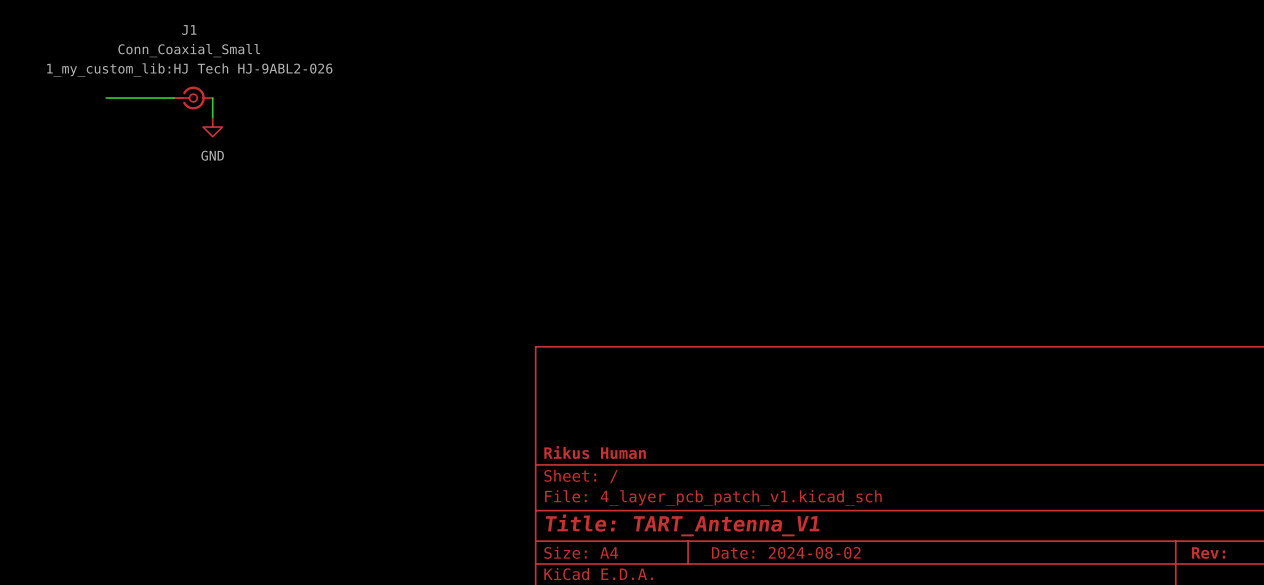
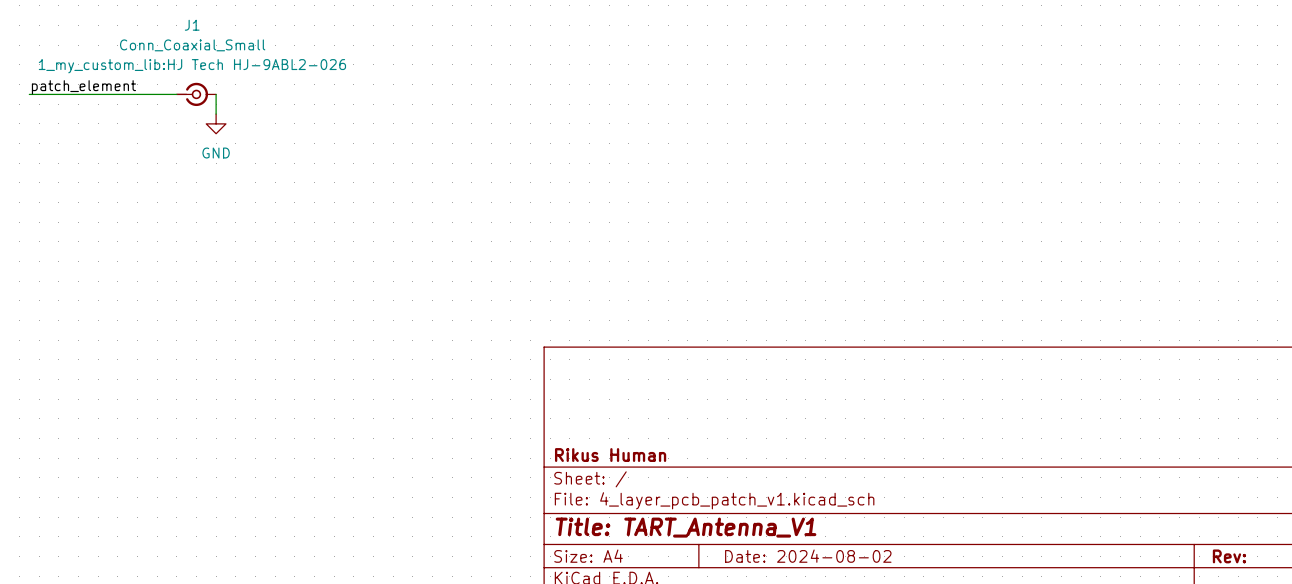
label: none -> patch_element (83, 87)
wire: none -> (29, 94) (107, 94)

